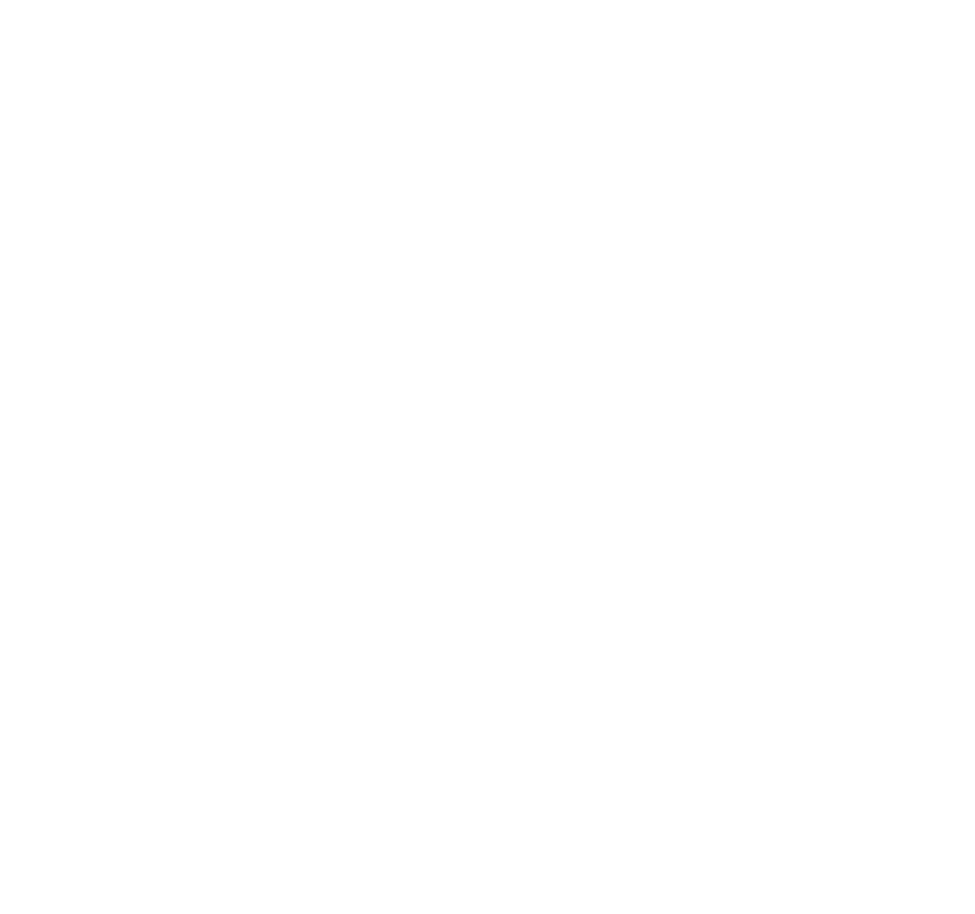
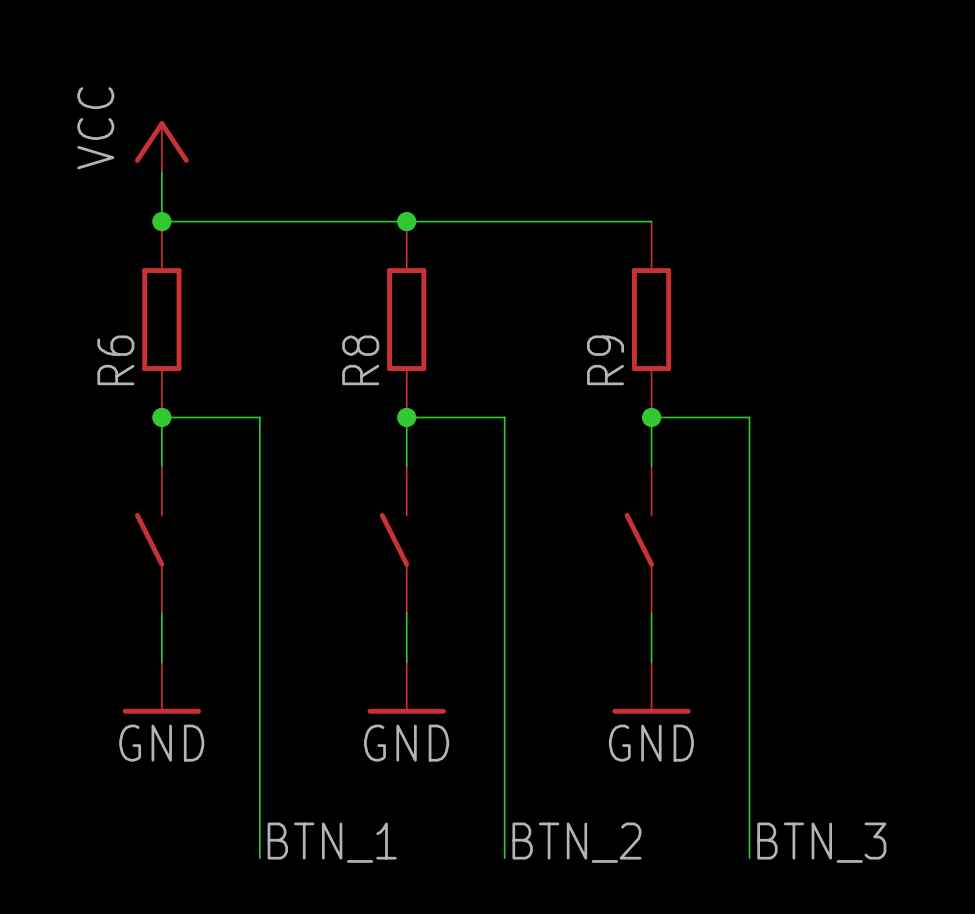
power symbol: none -> VCC (161, 146)
wire: none -> (161, 172) (161, 221) (651, 221)
junction: none -> (161, 221)
junction: none -> (406, 221)
R6: none -> (161, 319)
R8: none -> (406, 319)
R9: none -> (651, 319)
junction: none -> (161, 417)
junction: none -> (406, 417)
junction: none -> (651, 417)
wire: none -> (161, 466) (161, 417) (259, 417) (259, 858)
wire: none -> (406, 466) (406, 417) (504, 417) (504, 858)
wire: none -> (651, 466) (651, 417) (749, 417) (749, 858)
part: none -> (149, 539)
part: none -> (394, 539)
part: none -> (639, 539)
wire: none -> (161, 613) (161, 662)
wire: none -> (406, 613) (406, 662)
wire: none -> (651, 613) (651, 662)
power symbol: none -> GND (161, 688)
power symbol: none -> GND (406, 688)
power symbol: none -> GND (651, 688)
label: none -> BTN_1 (332, 842)
label: none -> BTN_2 (576, 842)
label: none -> BTN_3 (821, 842)

